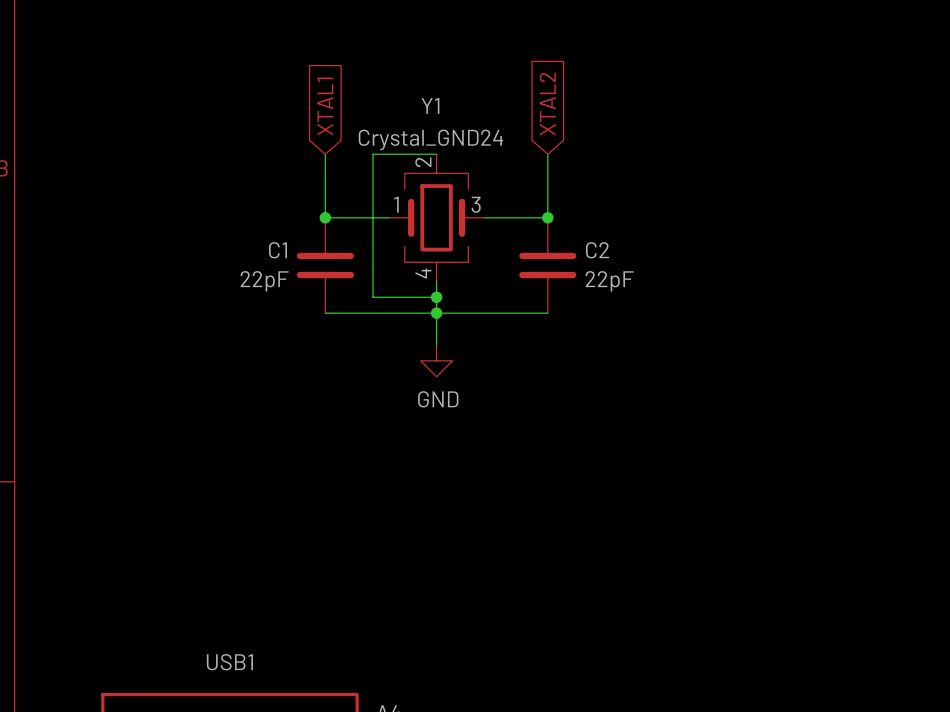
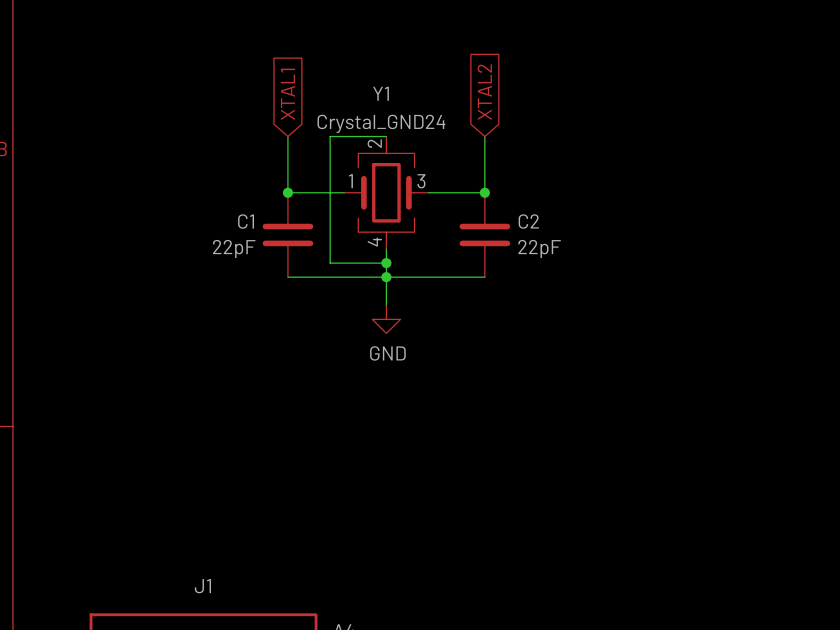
USB1 name: USB1 (229, 662) -> J1 (202, 586)

